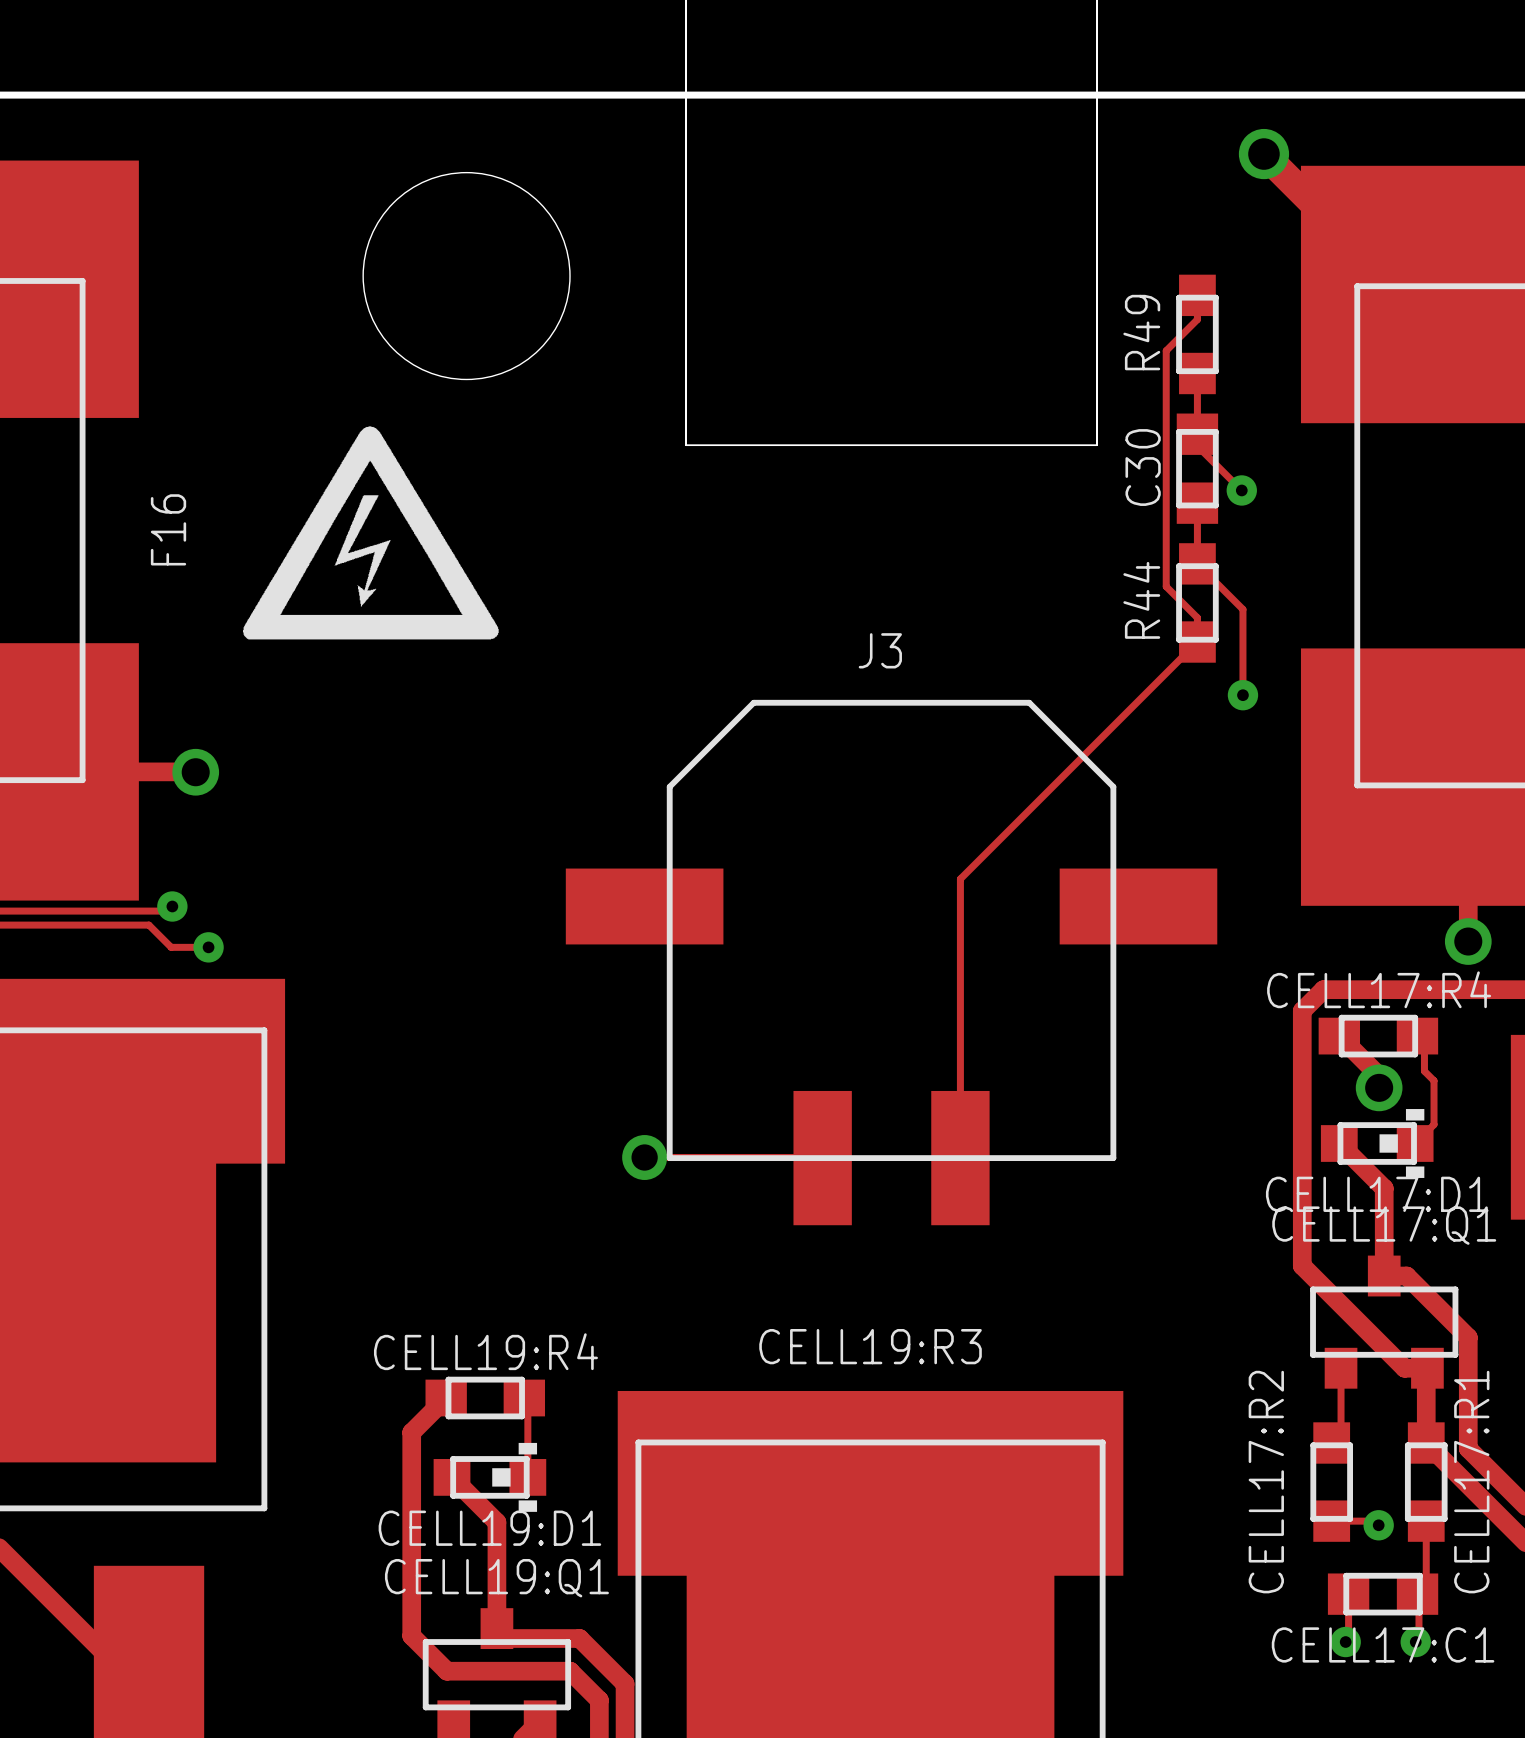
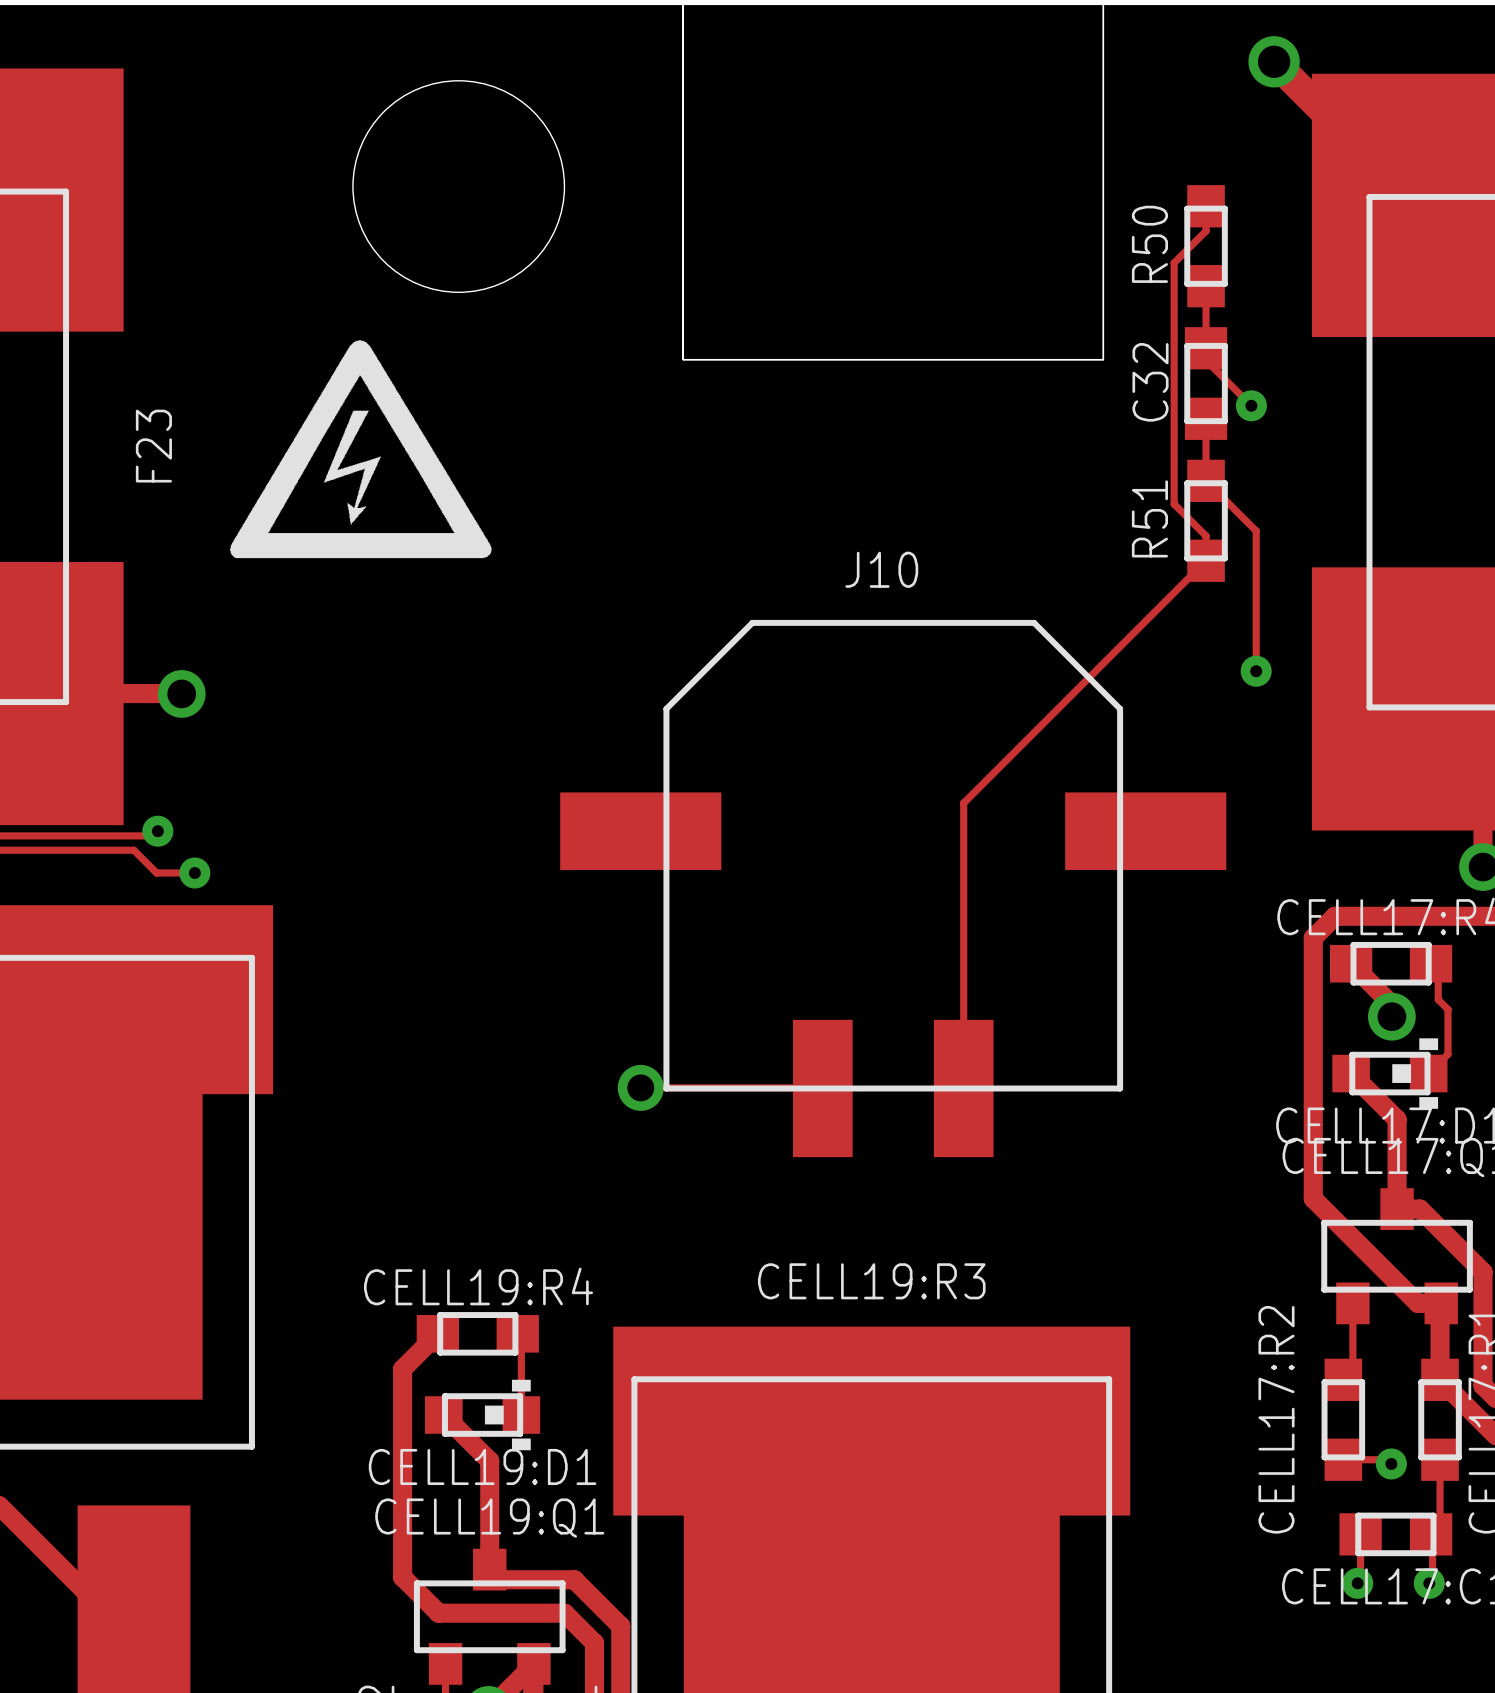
R49 name: R49 (1141, 332) -> R50 (1149, 244)
C30 name: C30 (1143, 467) -> C32 (1150, 382)
F16 name: F16 (168, 529) -> F23 (153, 446)
R44 name: R44 (1141, 600) -> R51 (1149, 518)
track: (1242, 609) (1242, 695) -> (1252, 527) (1256, 531) (1256, 671)
J3 name: J3 (880, 650) -> J10 (881, 569)
via position: (1242, 695) -> (1256, 671)

